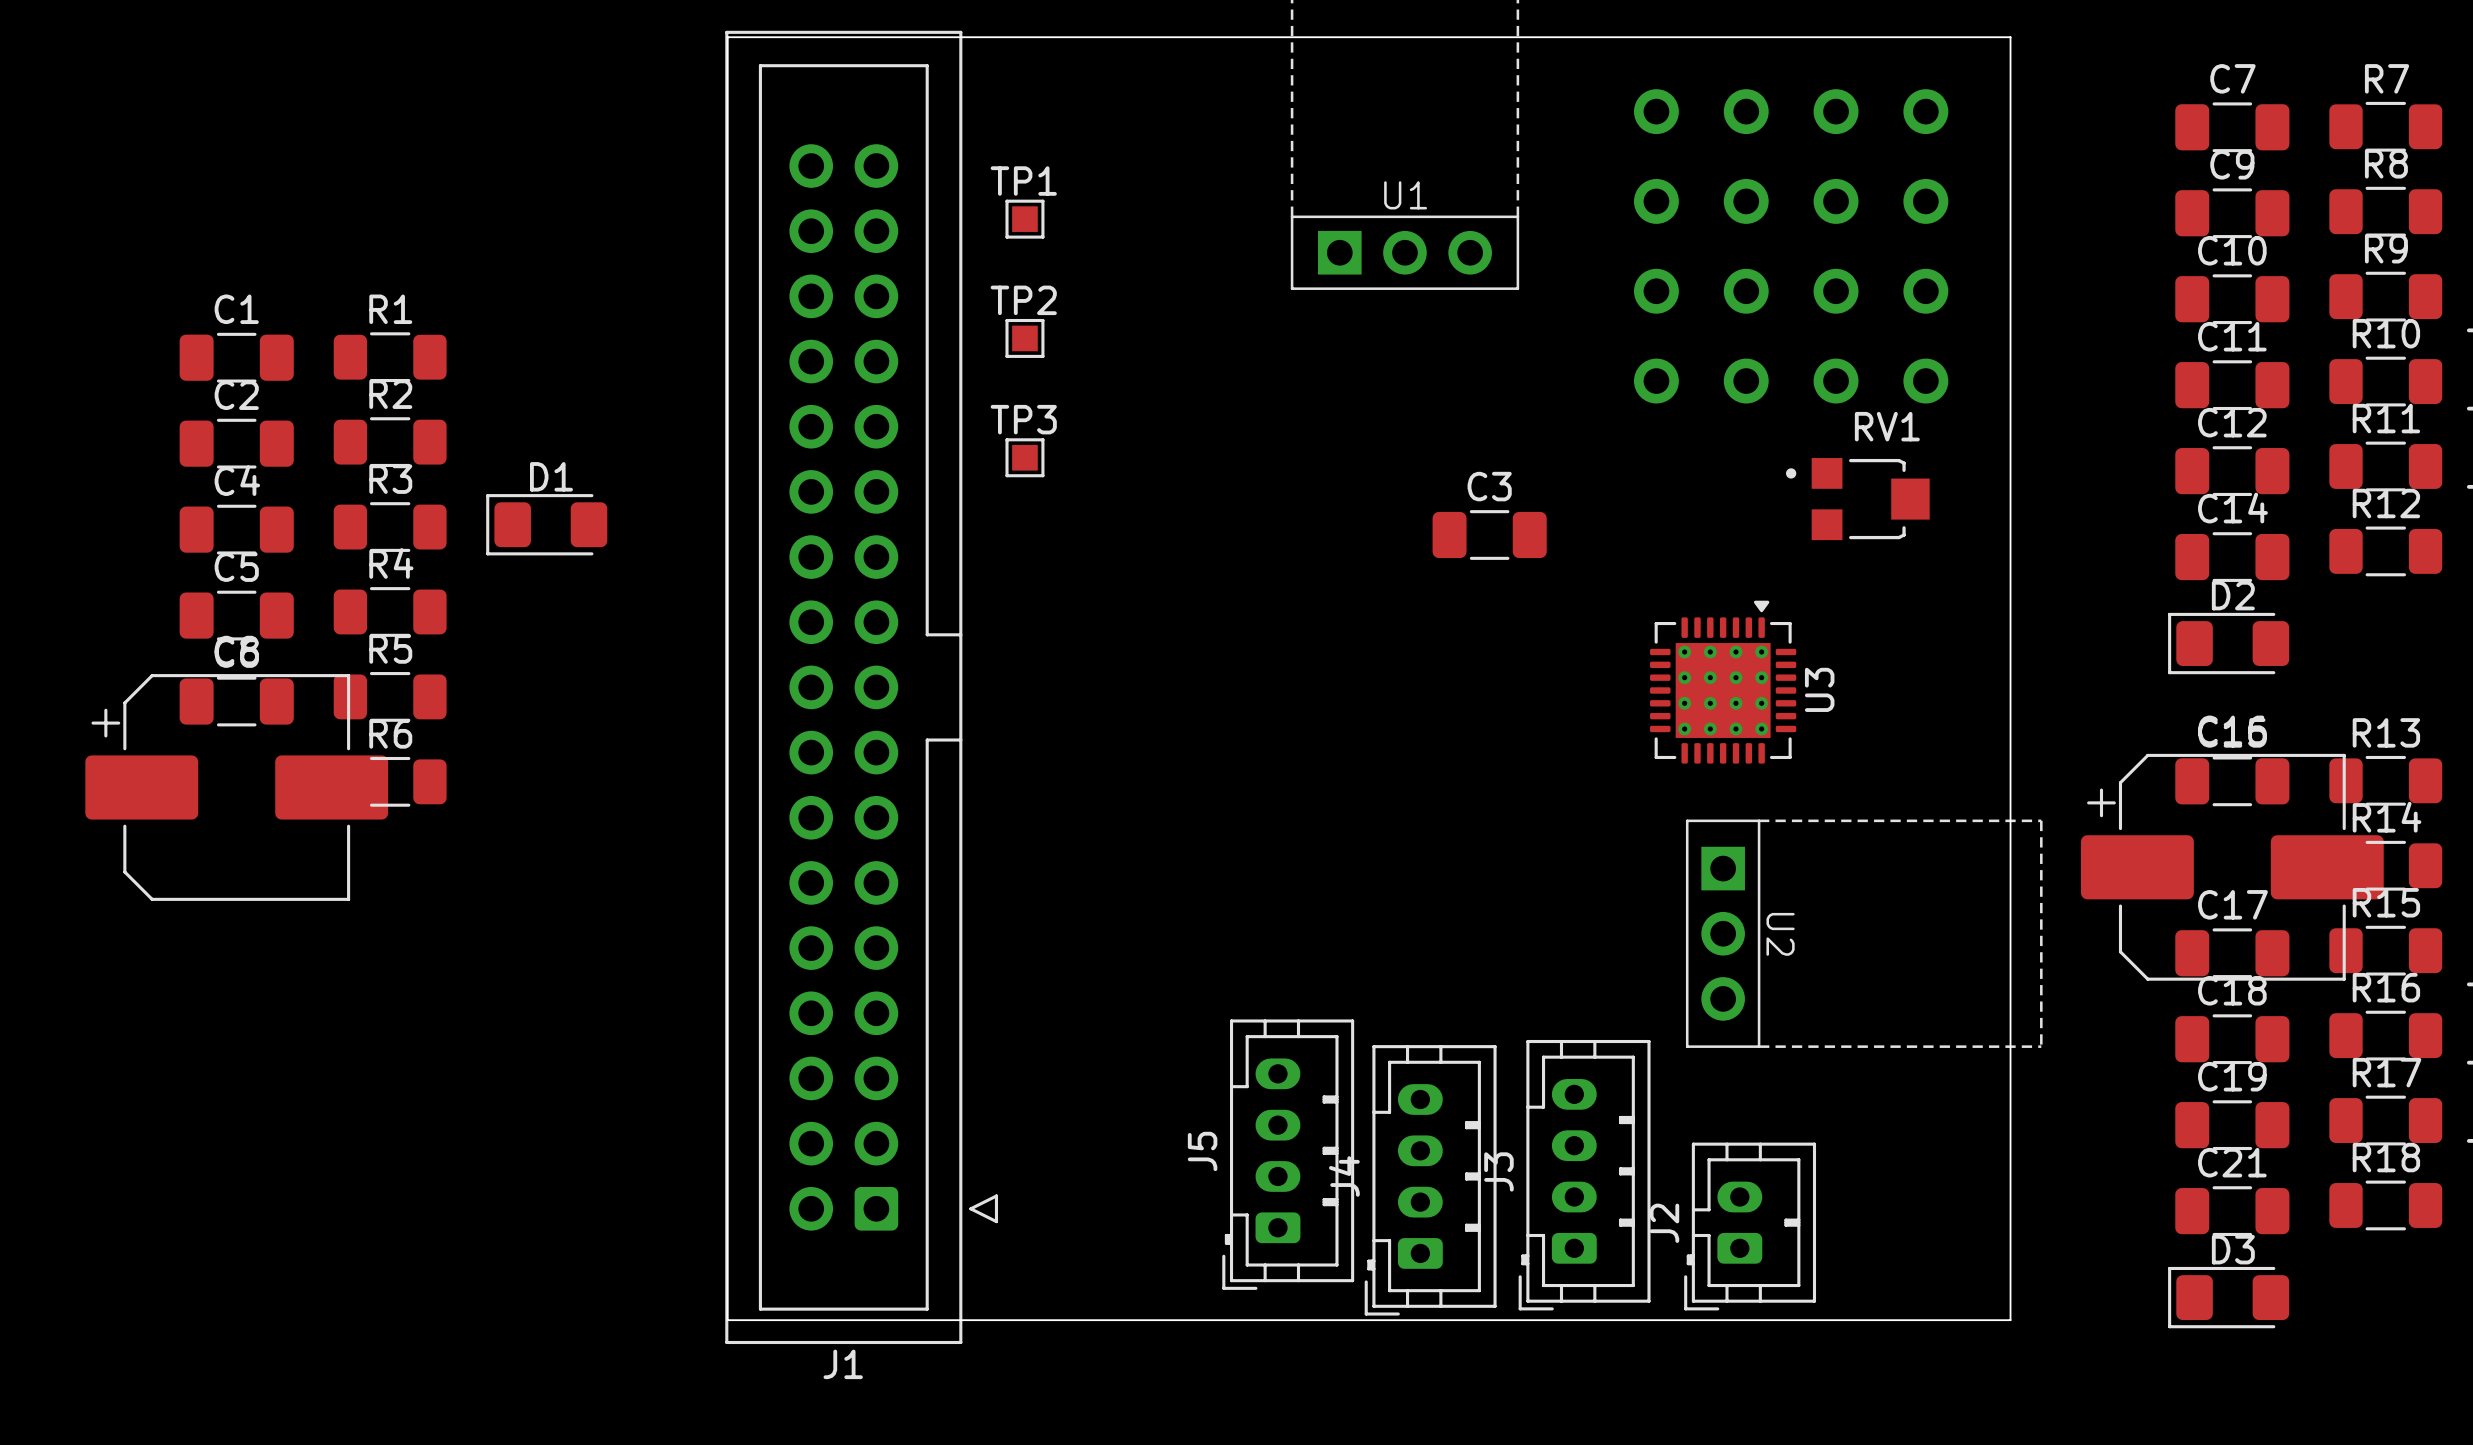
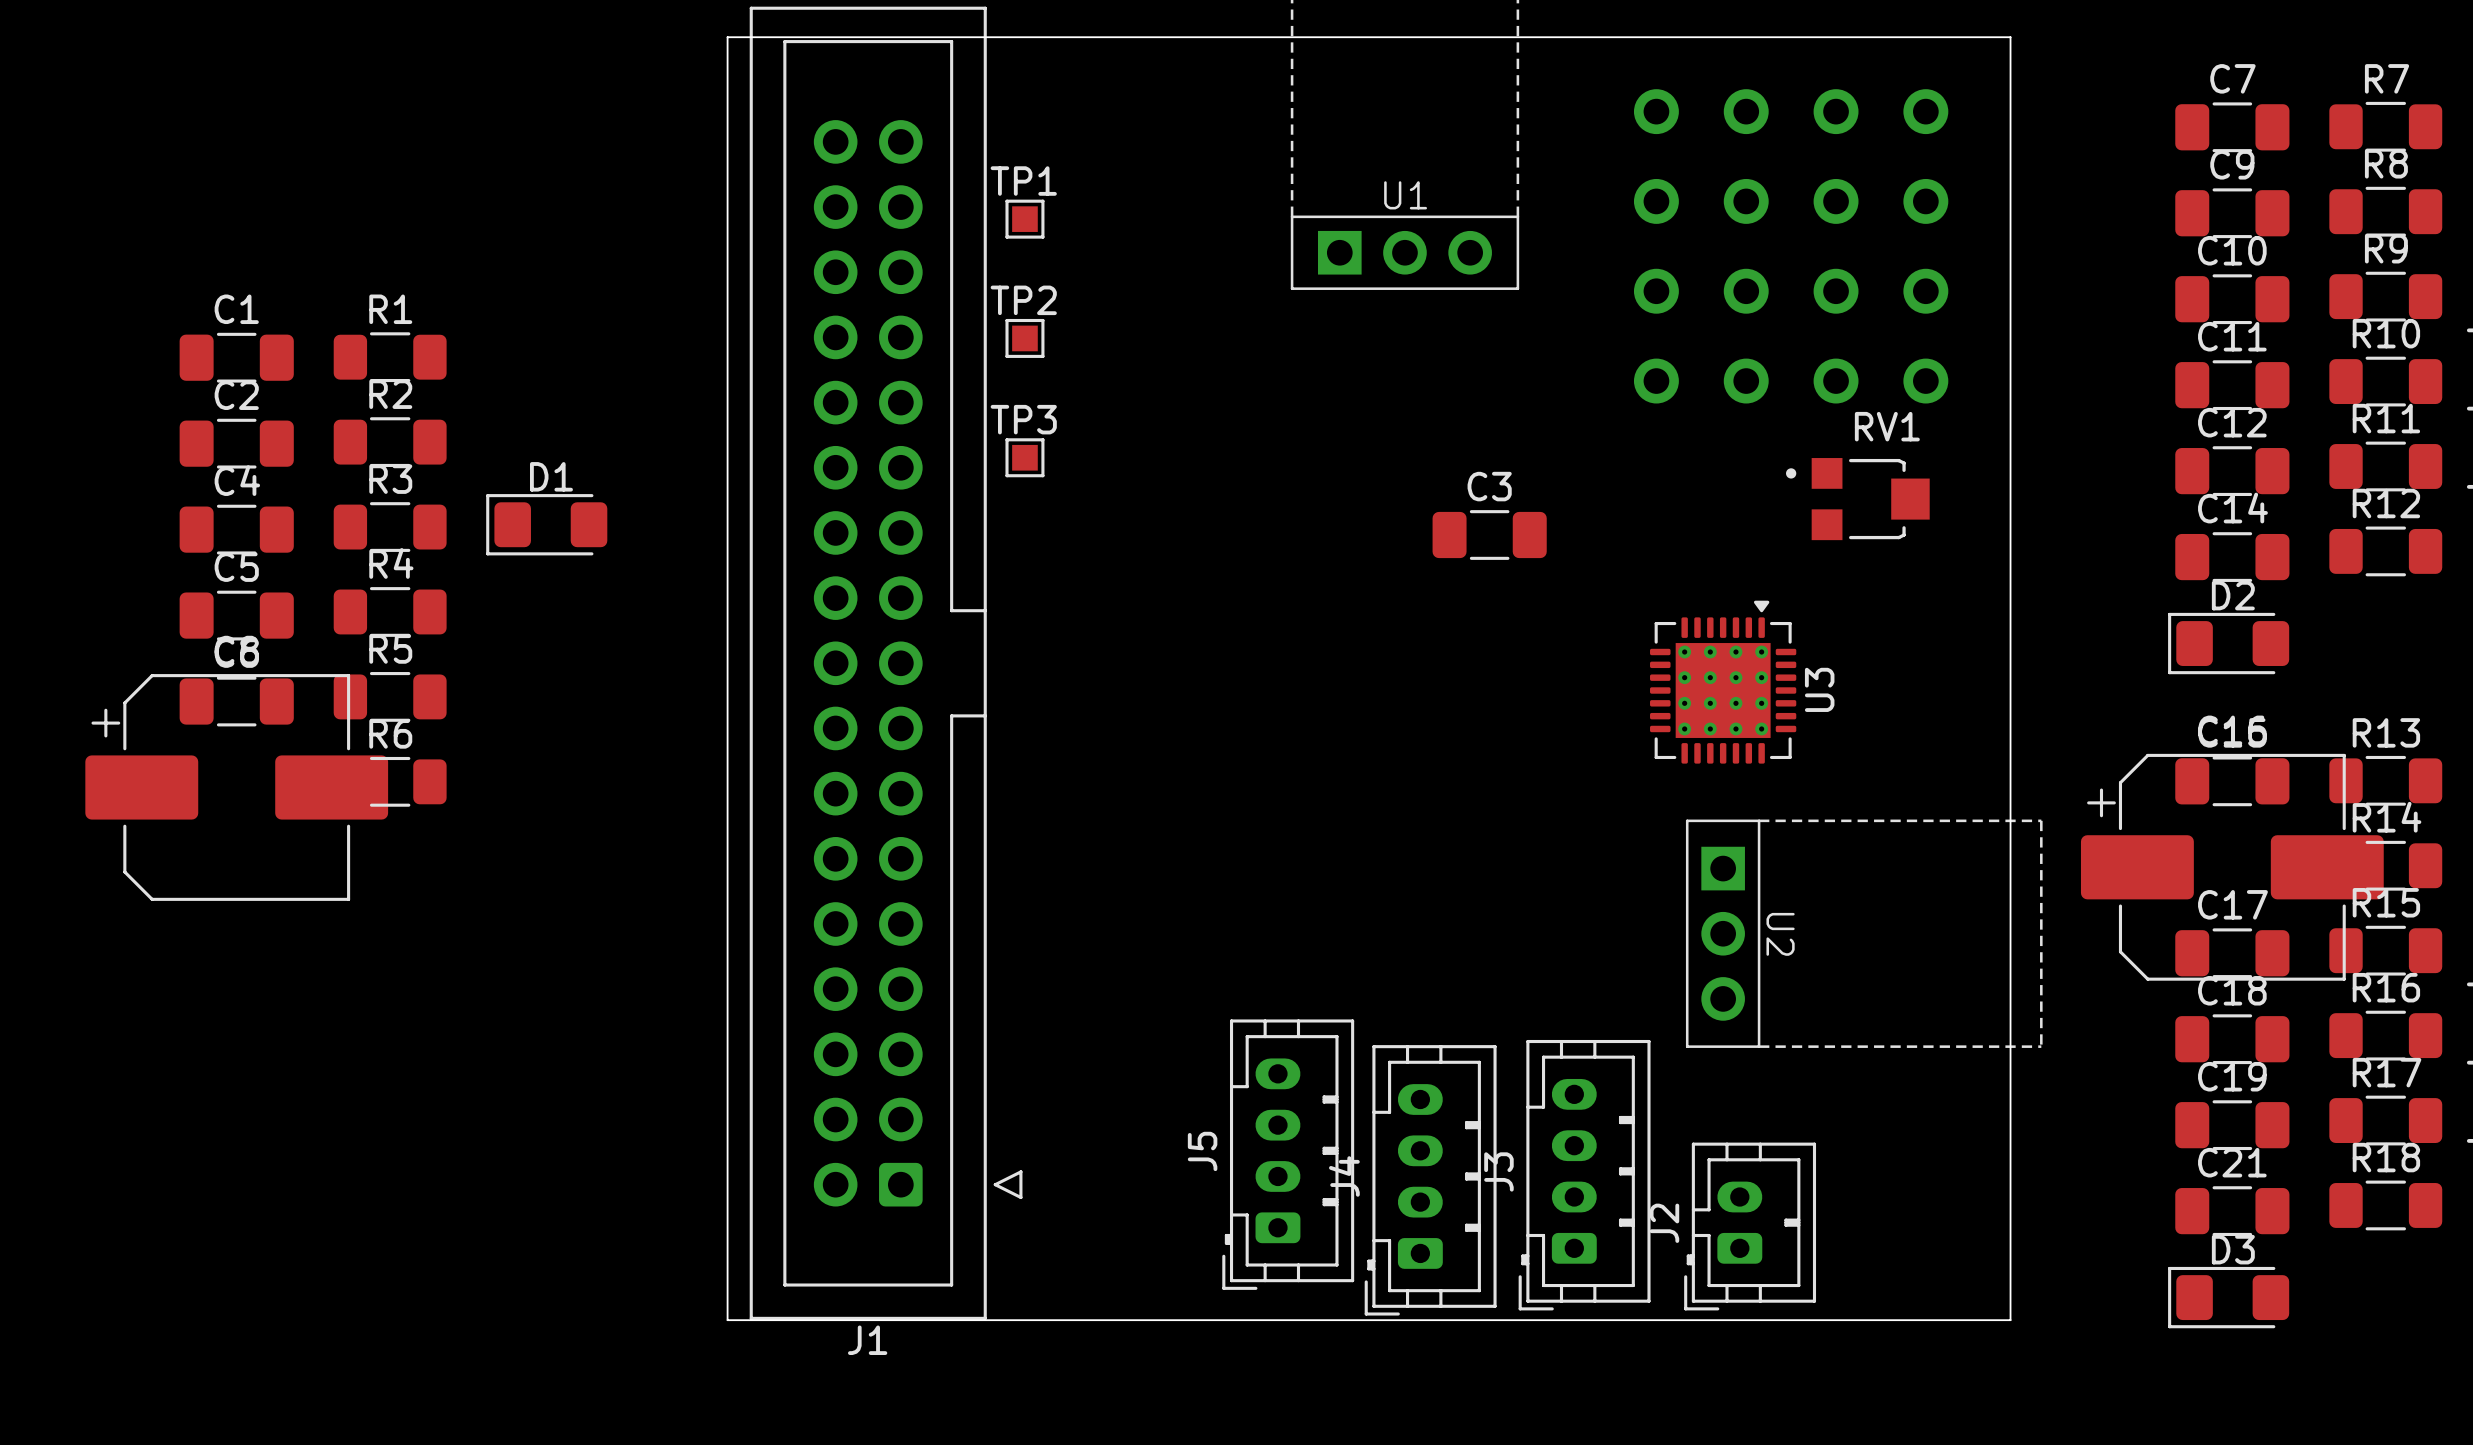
J1 position: (861, 687) -> (886, 663)

